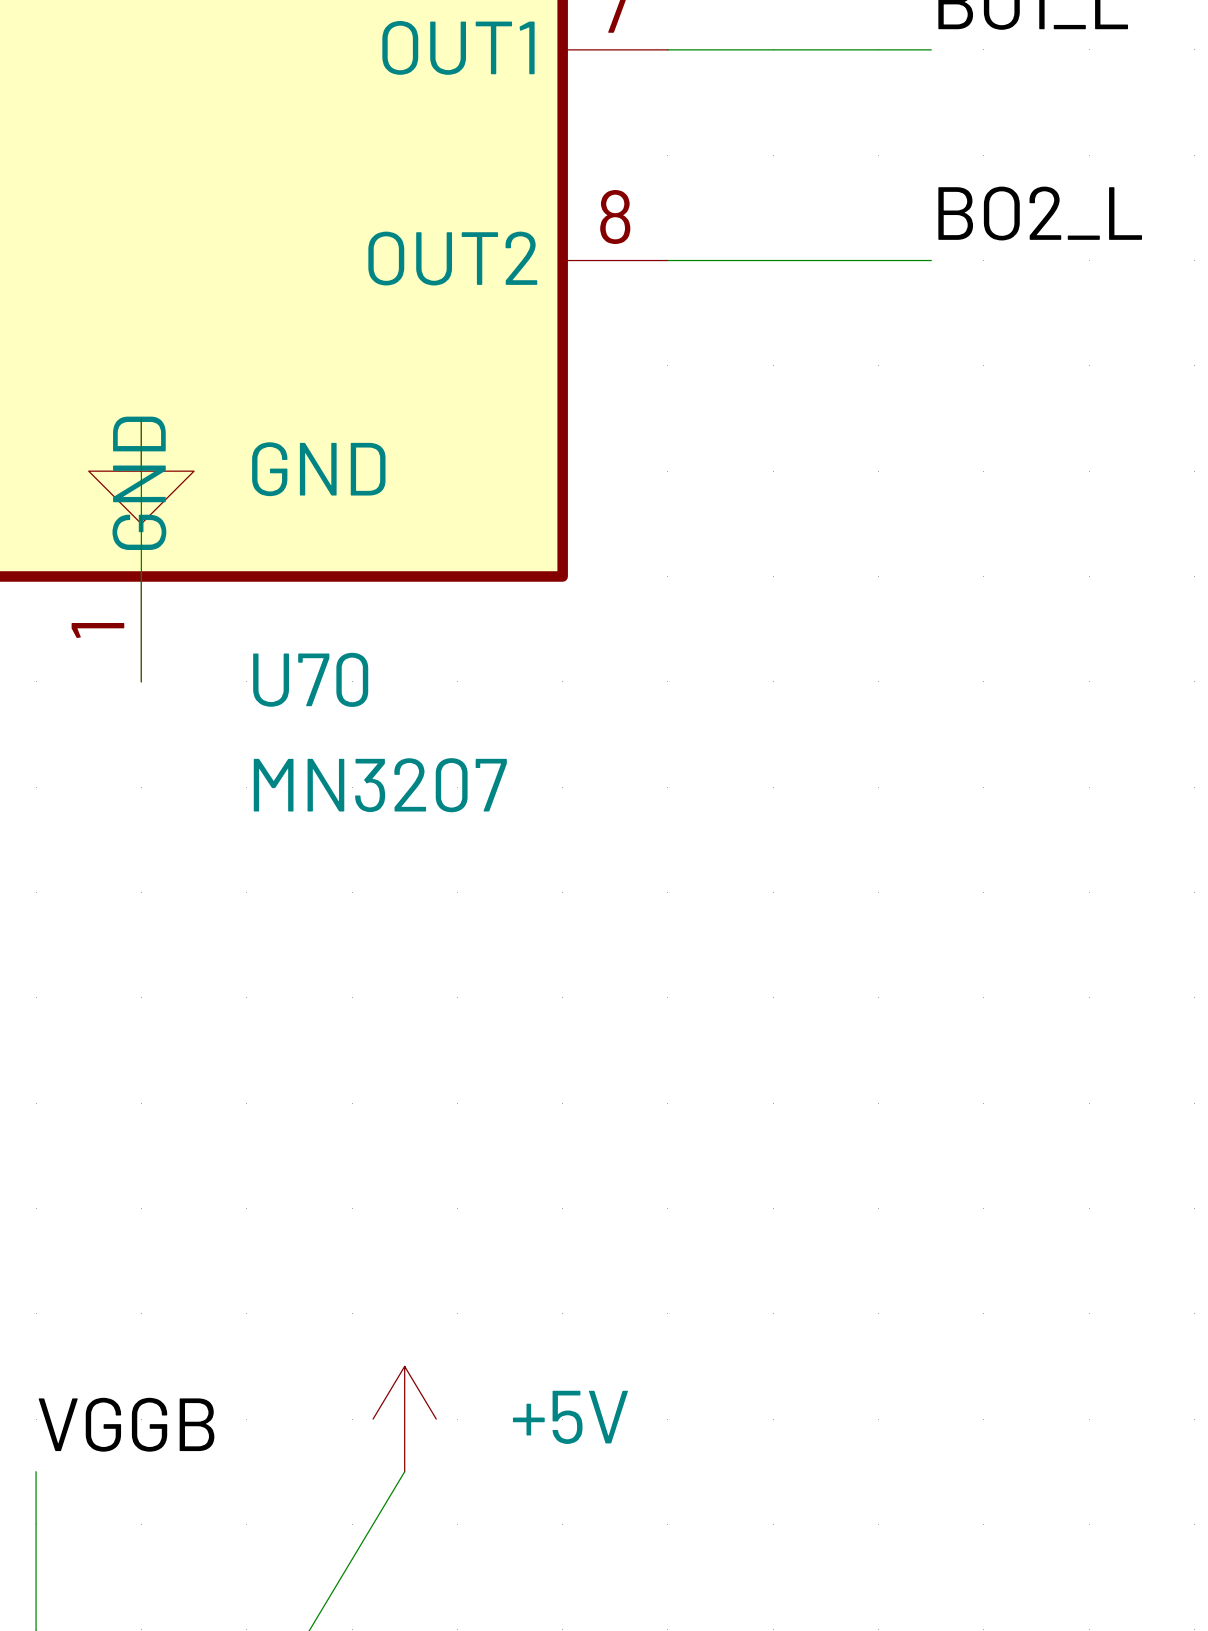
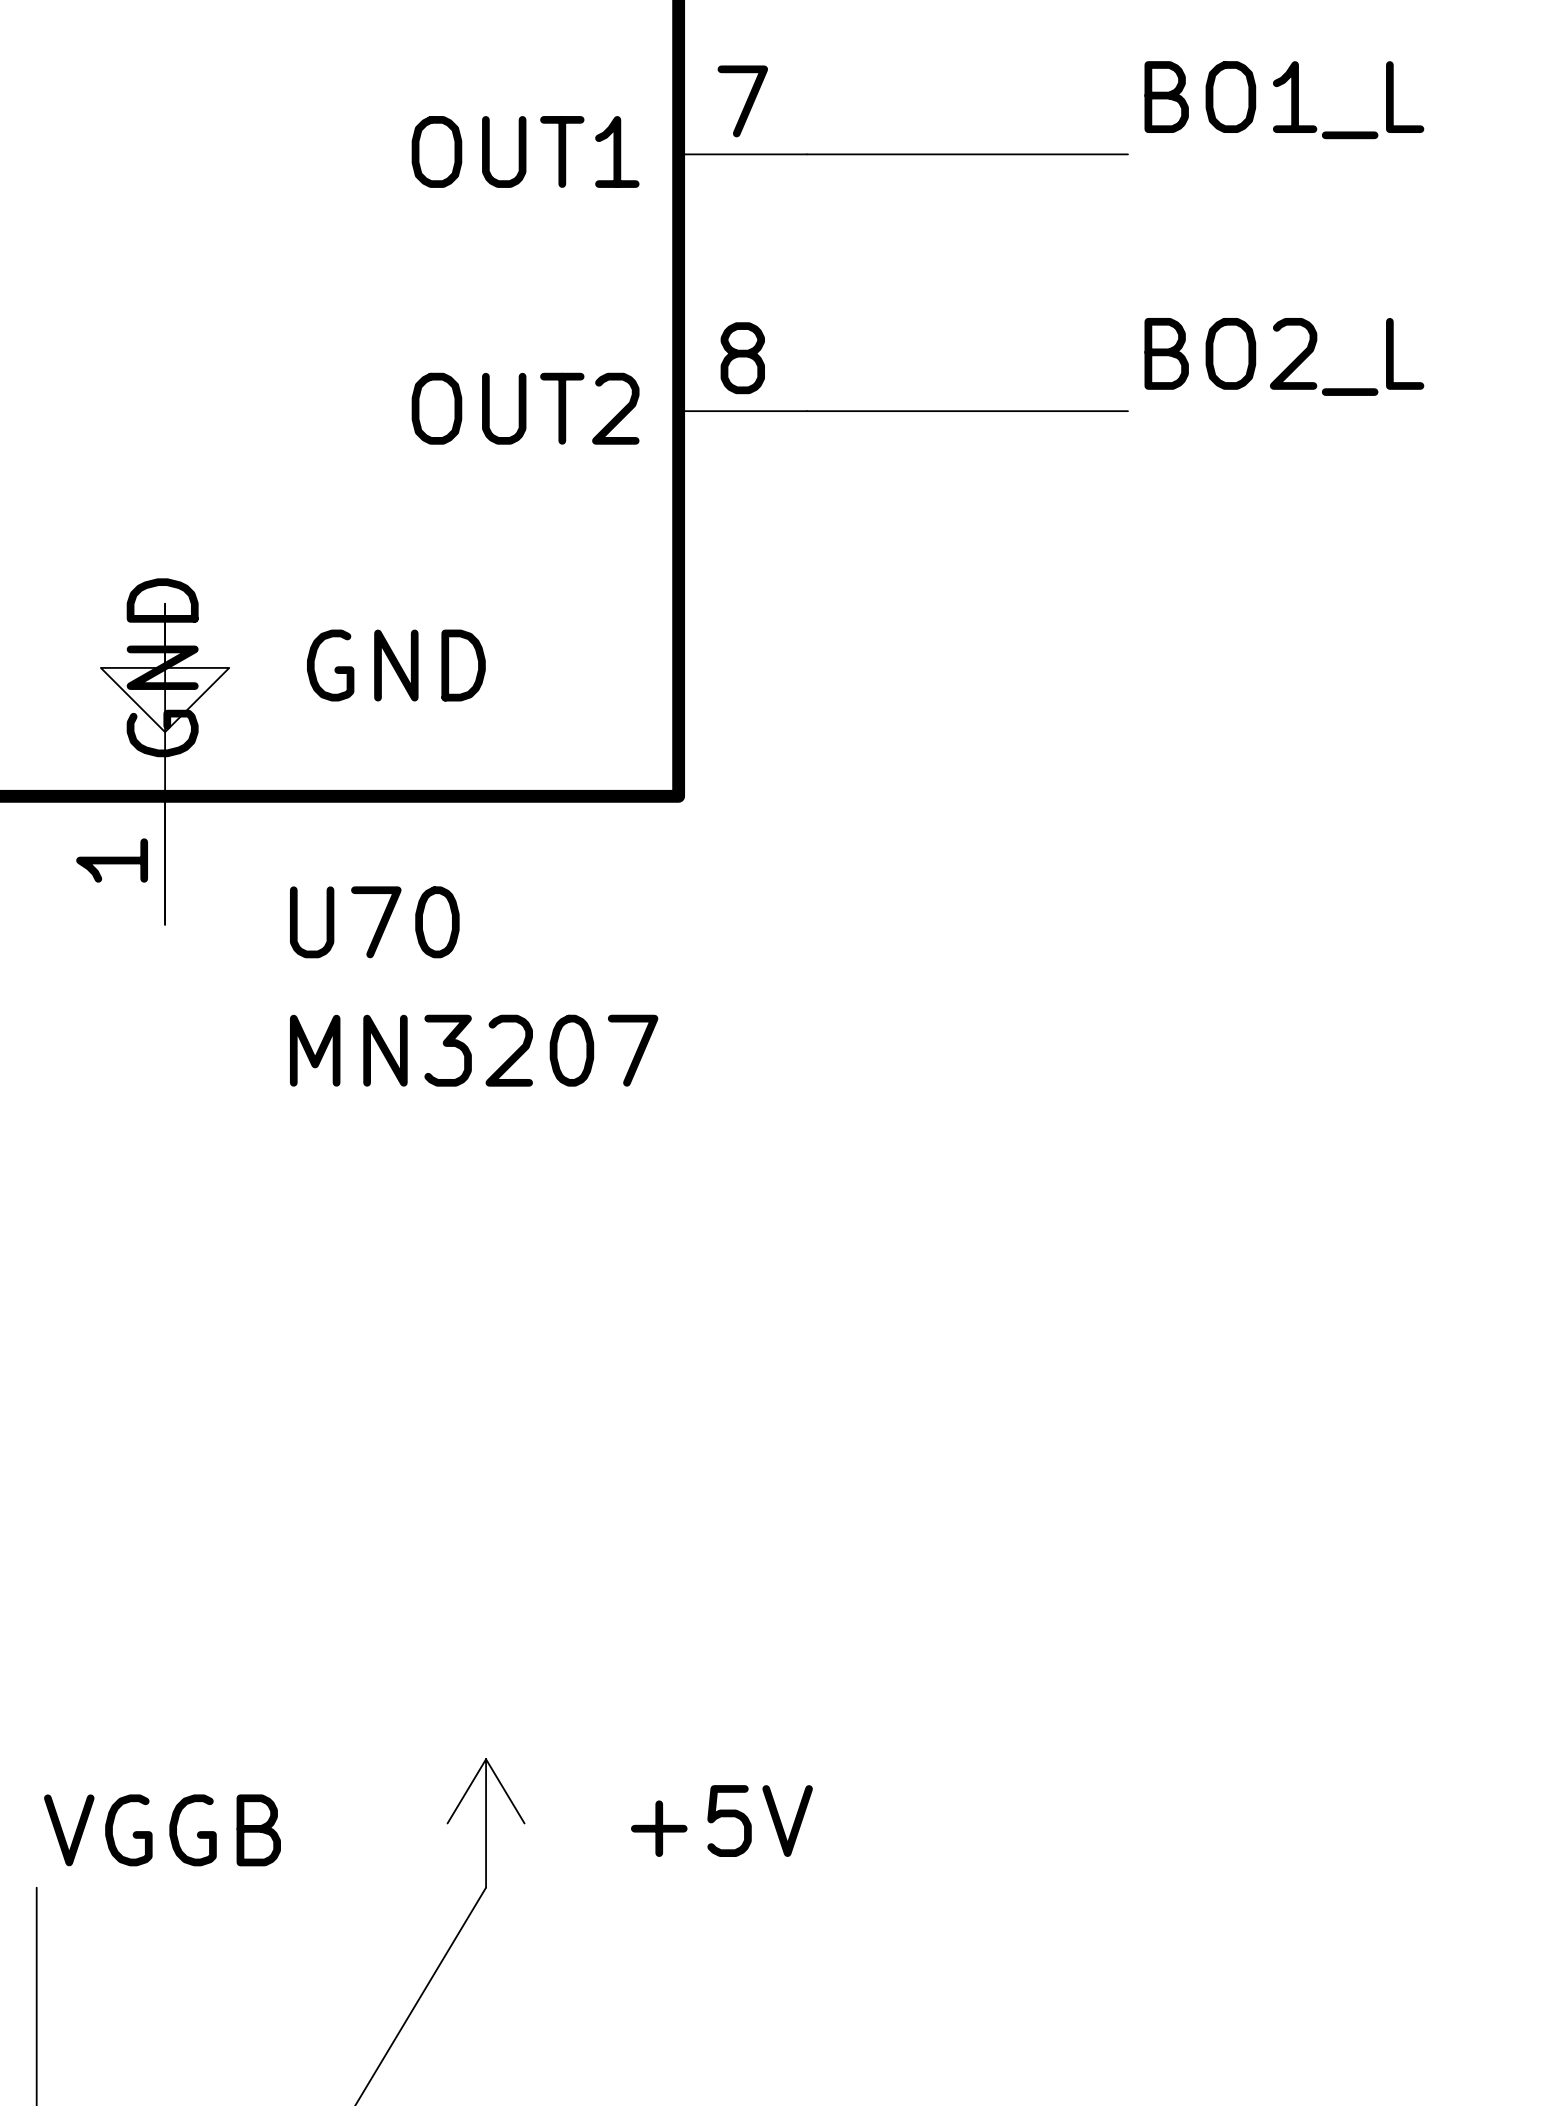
U70 name position: U70 (310, 679) -> U70 (374, 922)
U70 value position: MN3207 (380, 785) -> MN3207 (474, 1050)

